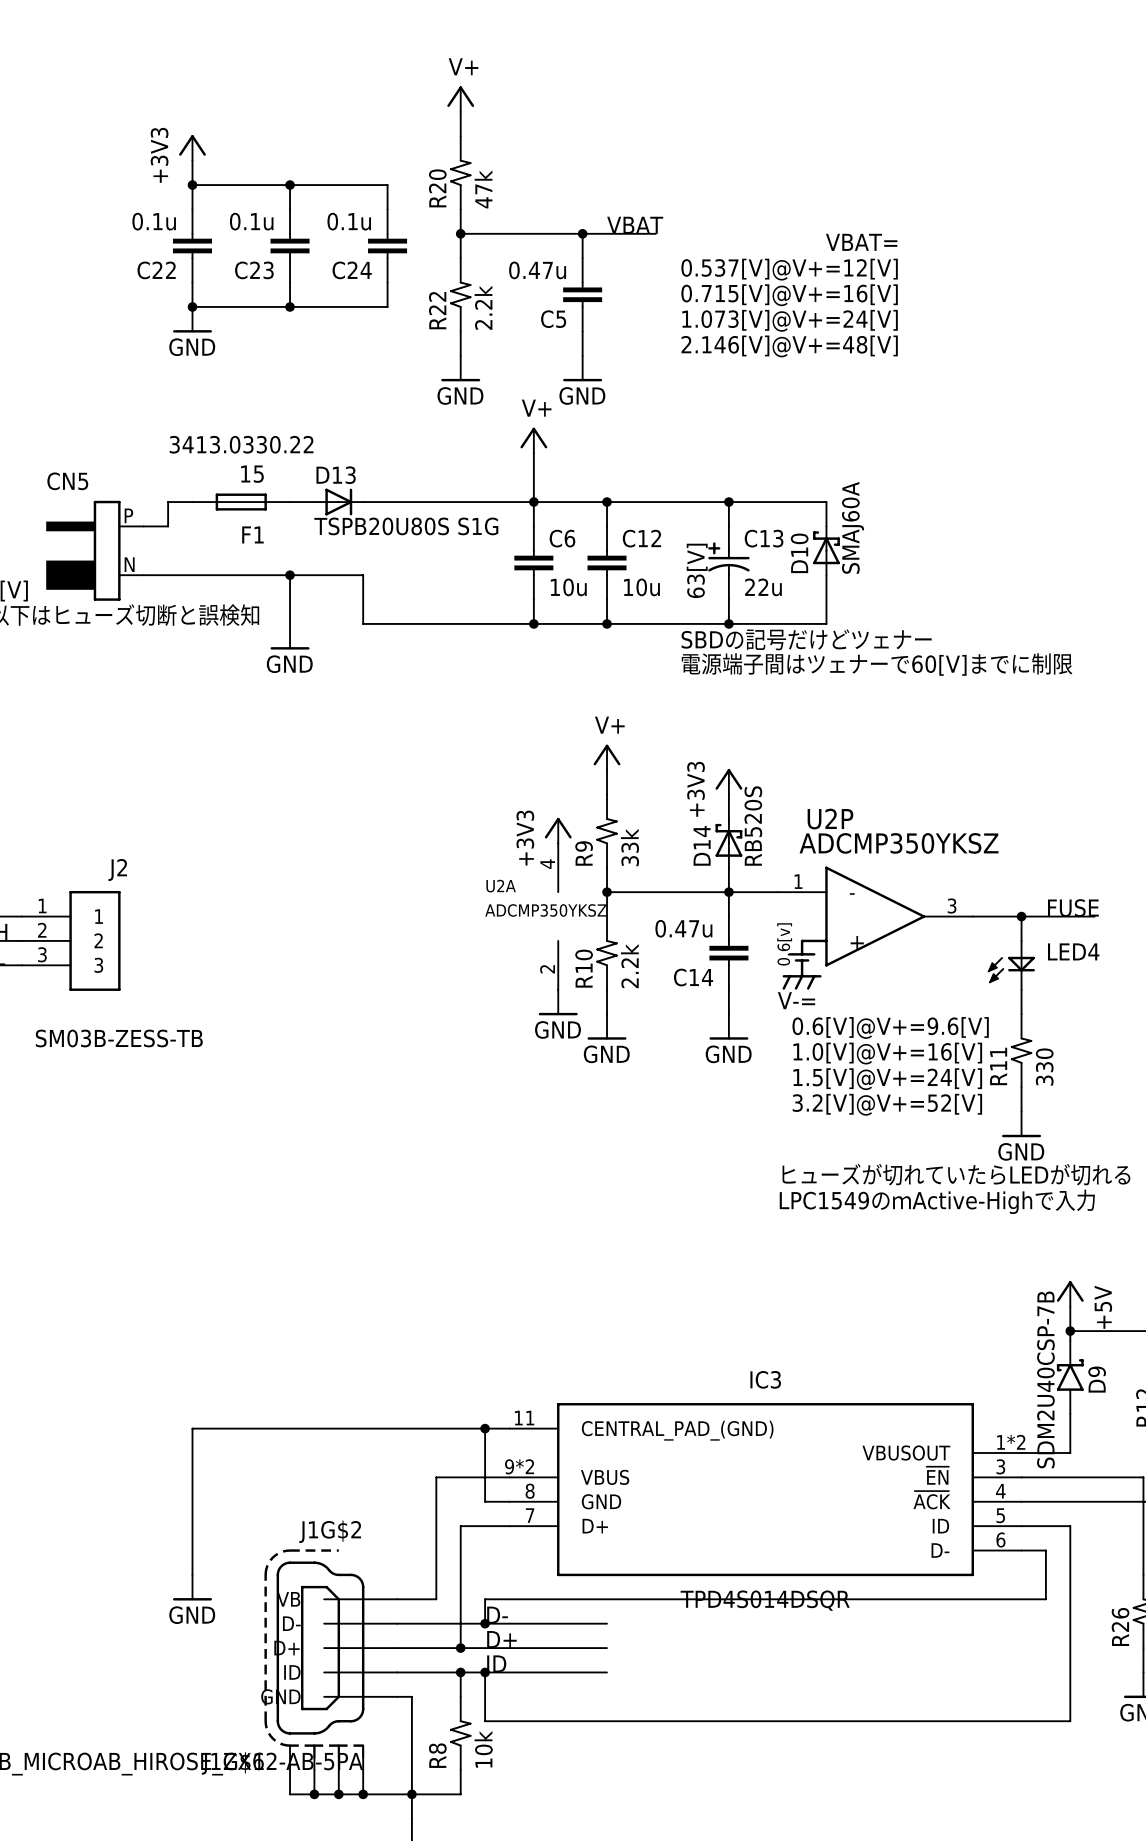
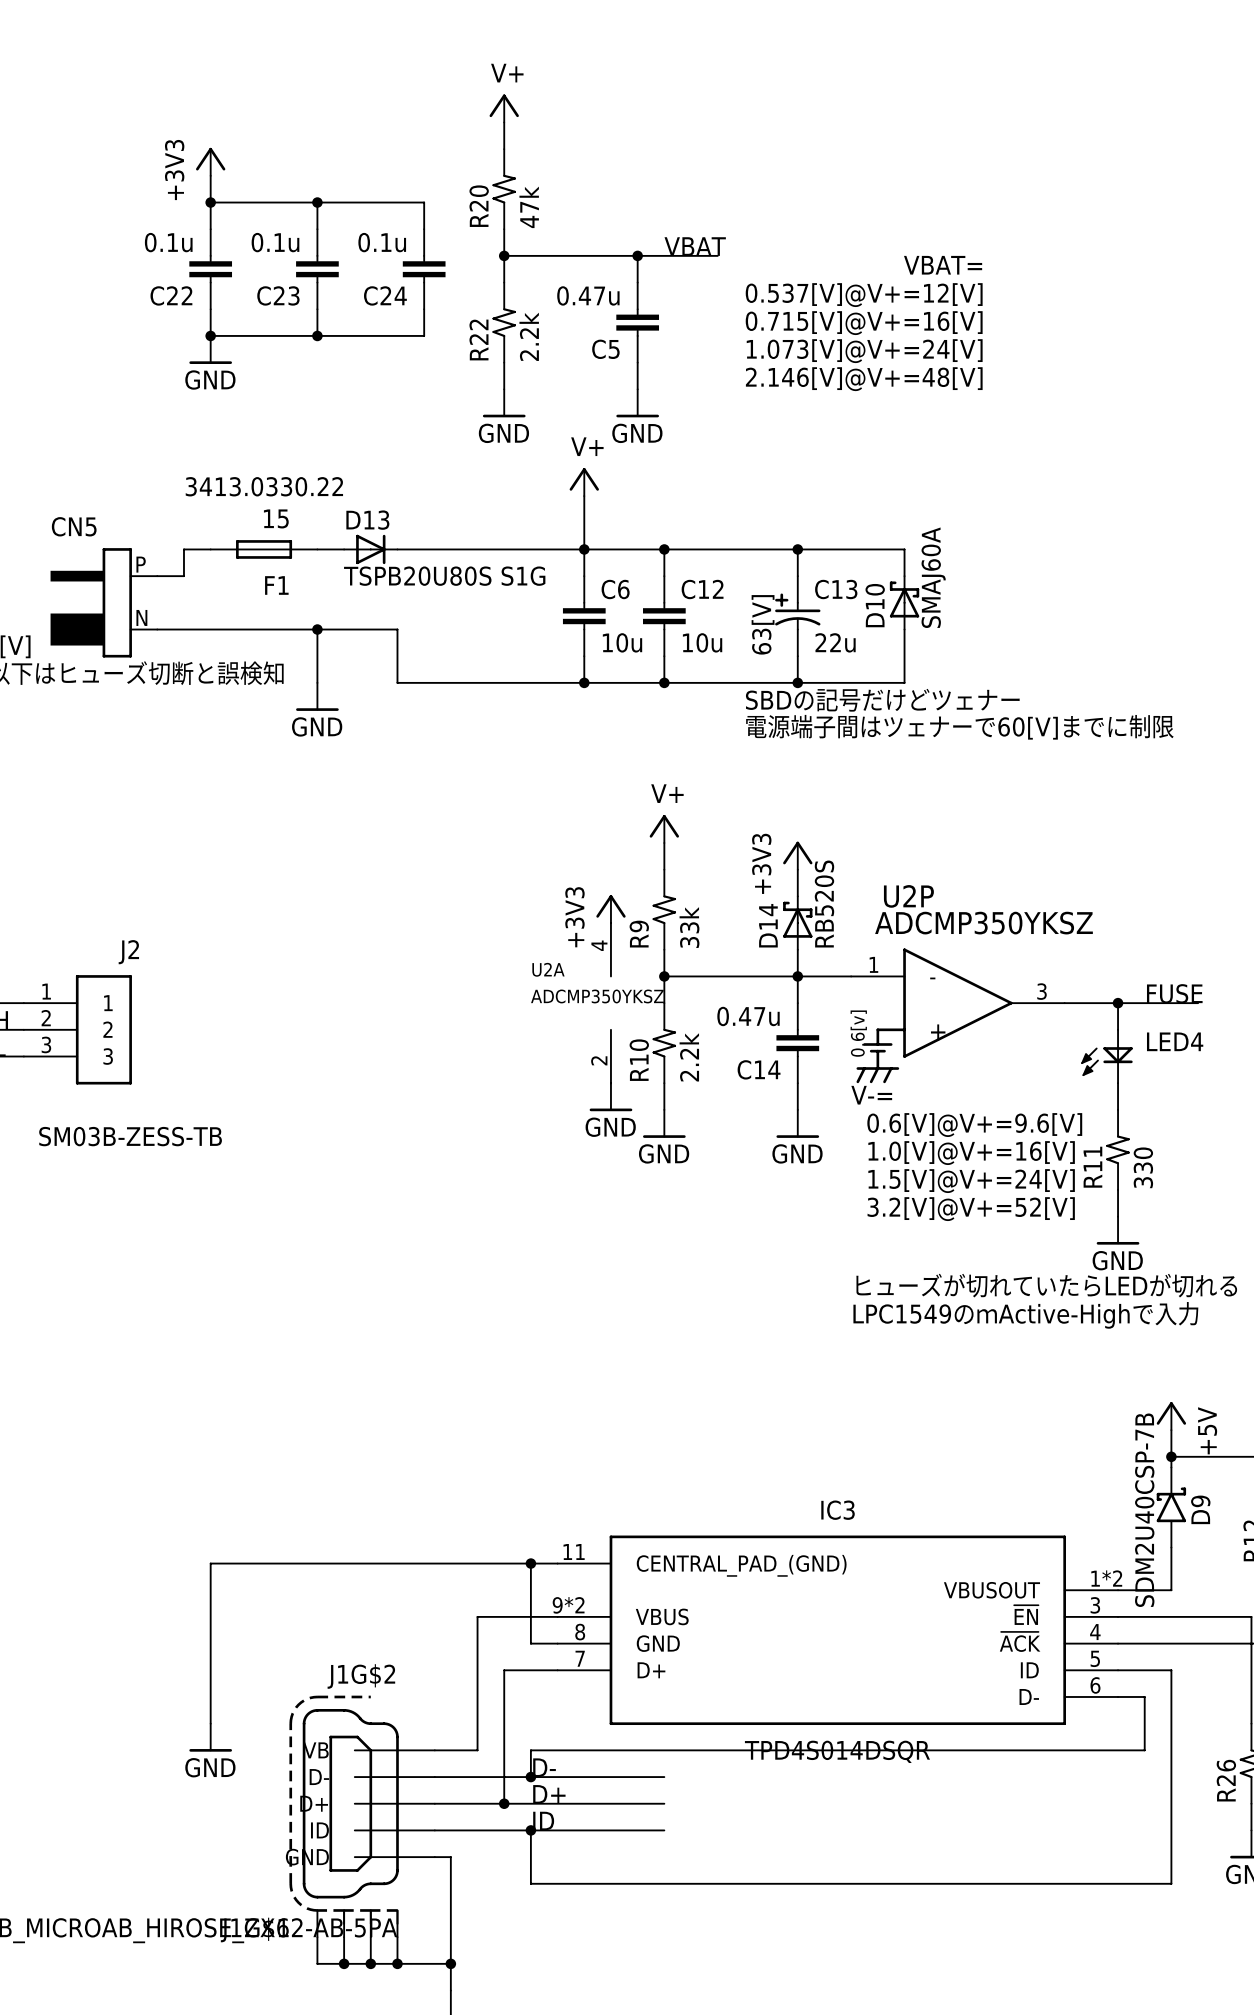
wire: (460, 1672) (460, 1696) -> none
junction: (460, 1672) -> none
R8: 10k (460, 1733) -> none
wire: (460, 1769) (460, 1794) (411, 1794) -> none

